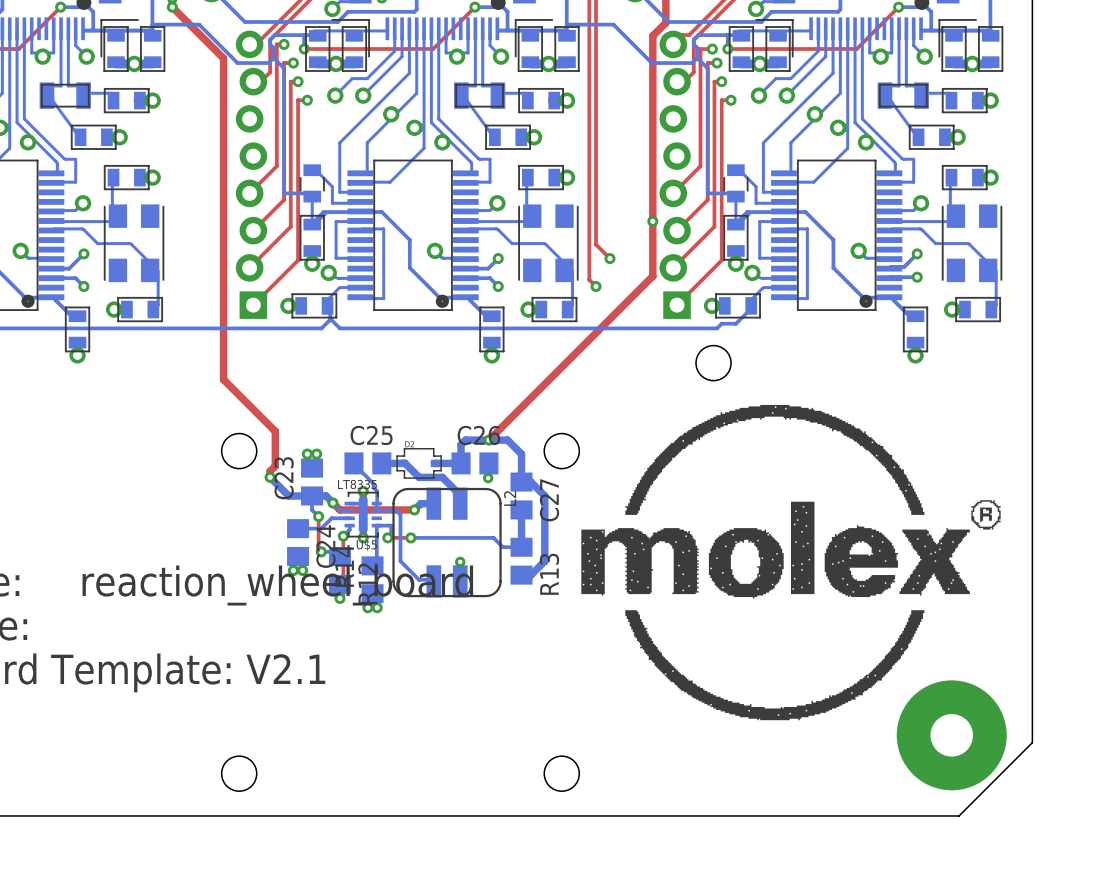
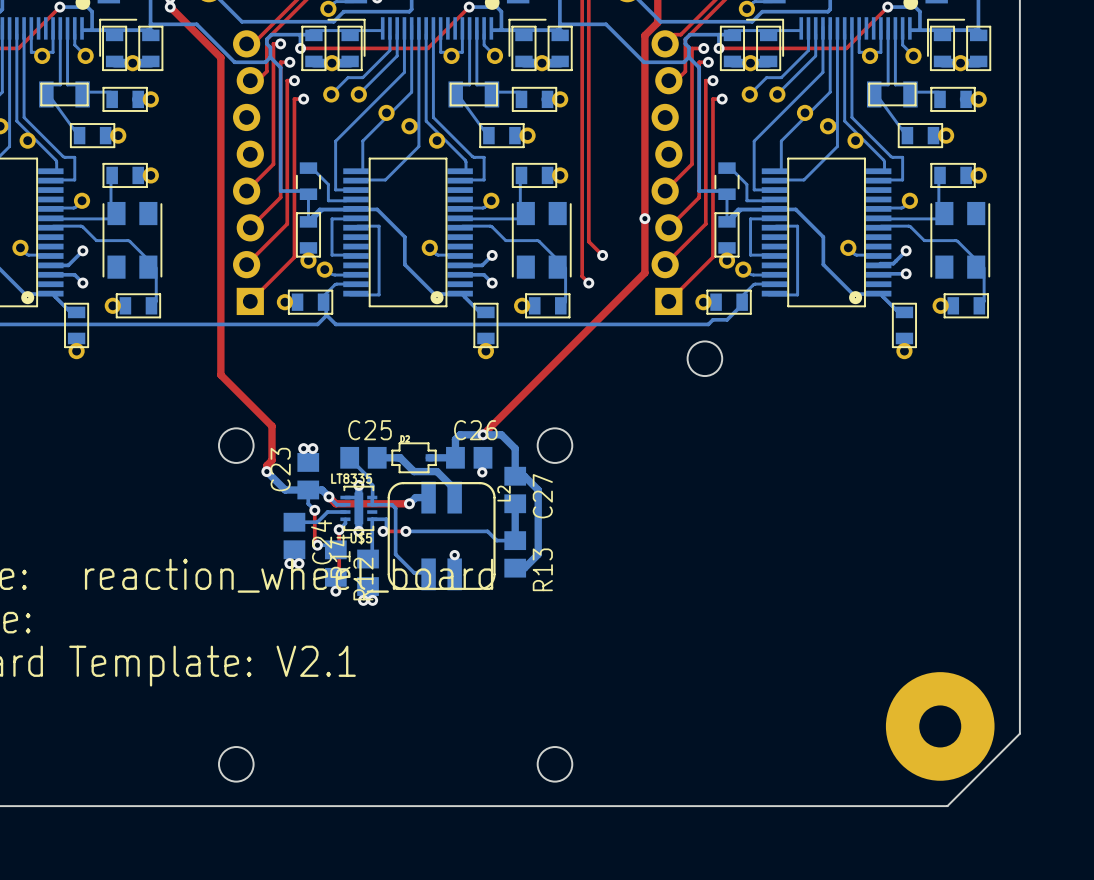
drawing: [581, 404, 1001, 721] -> none

